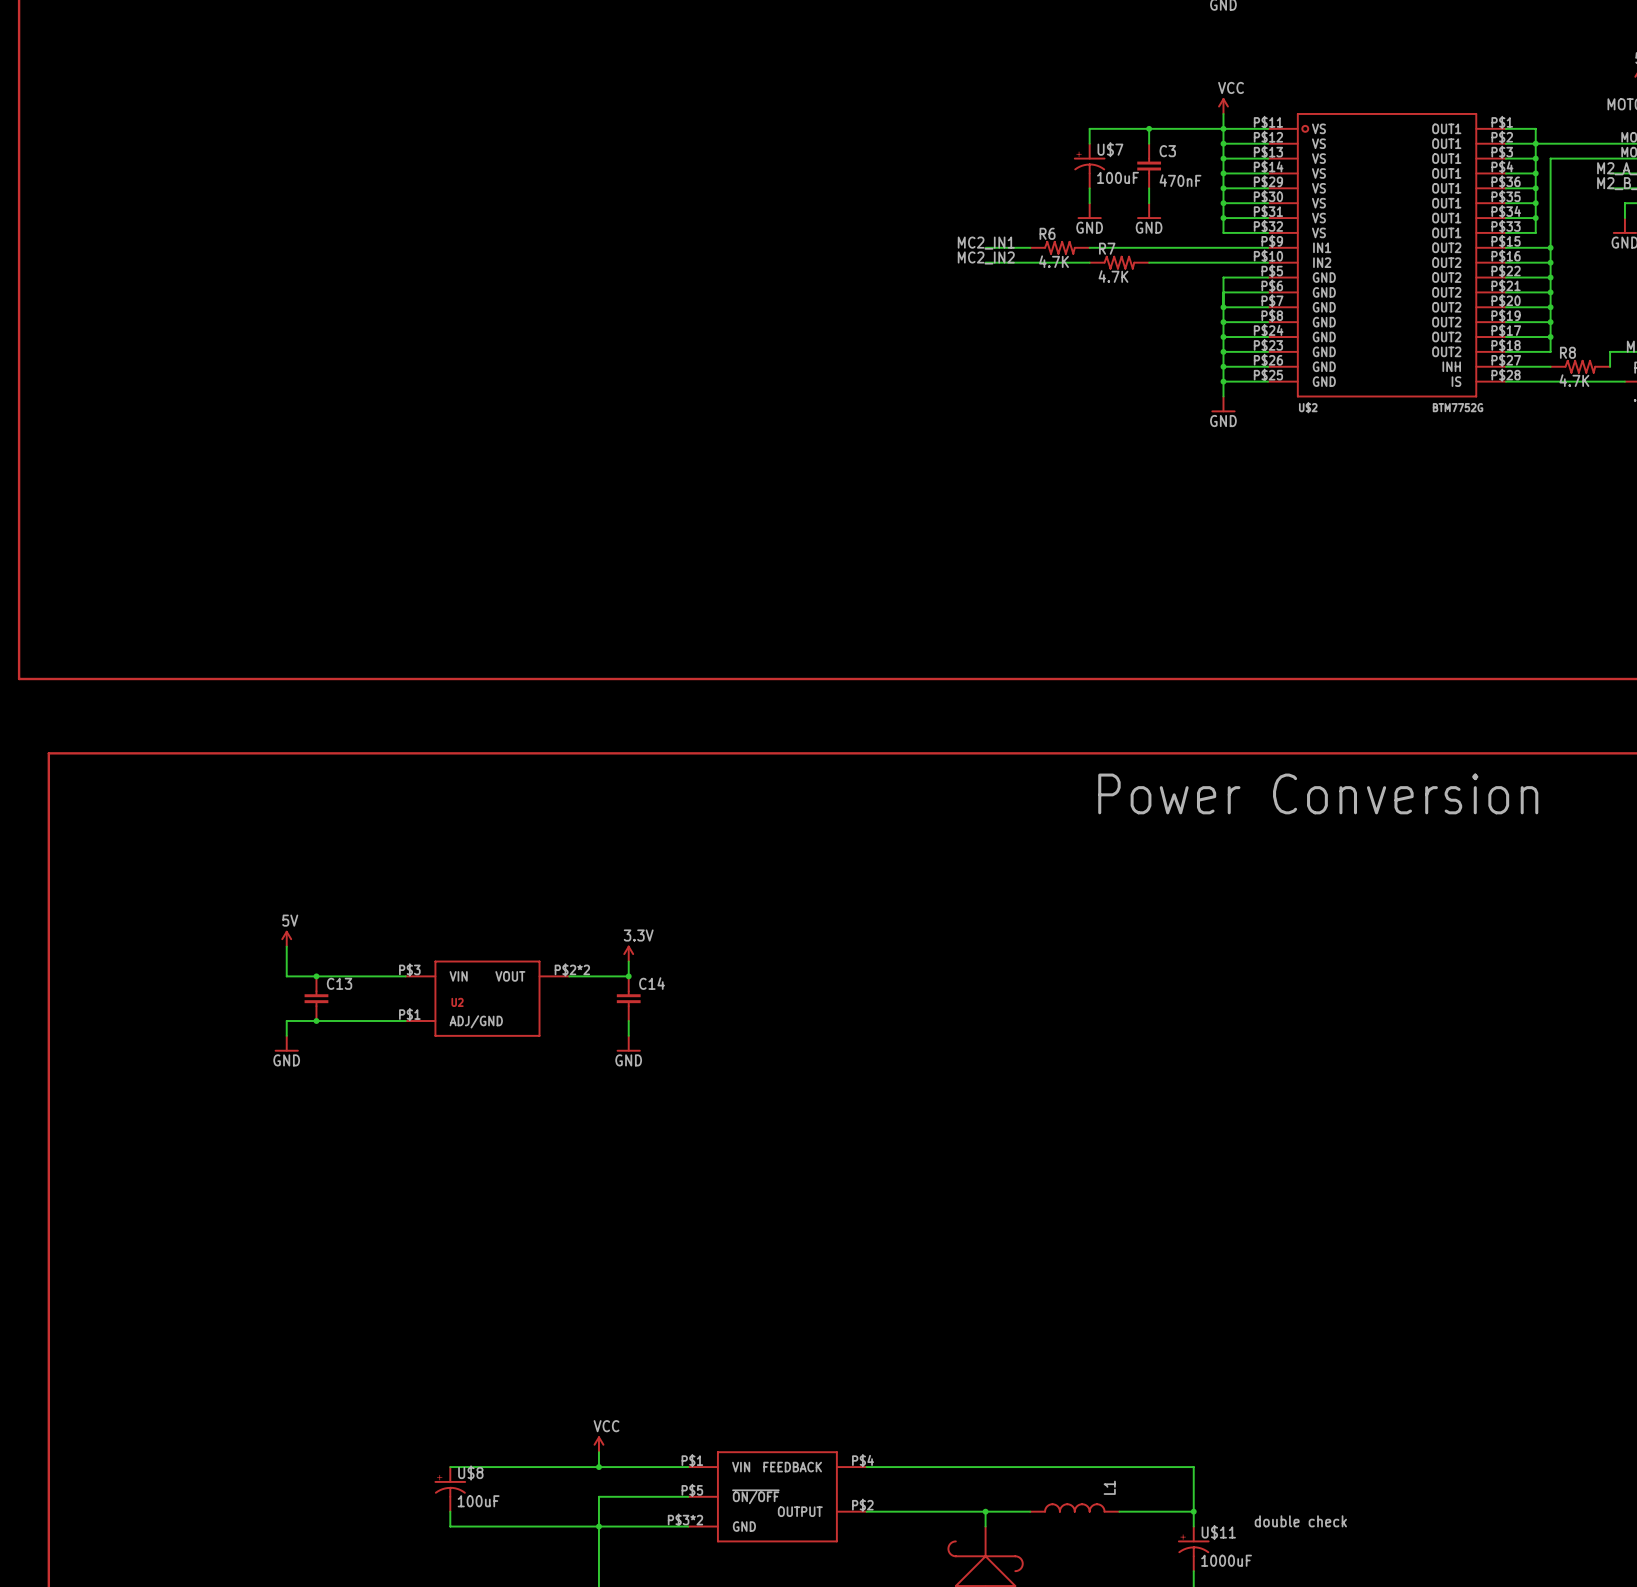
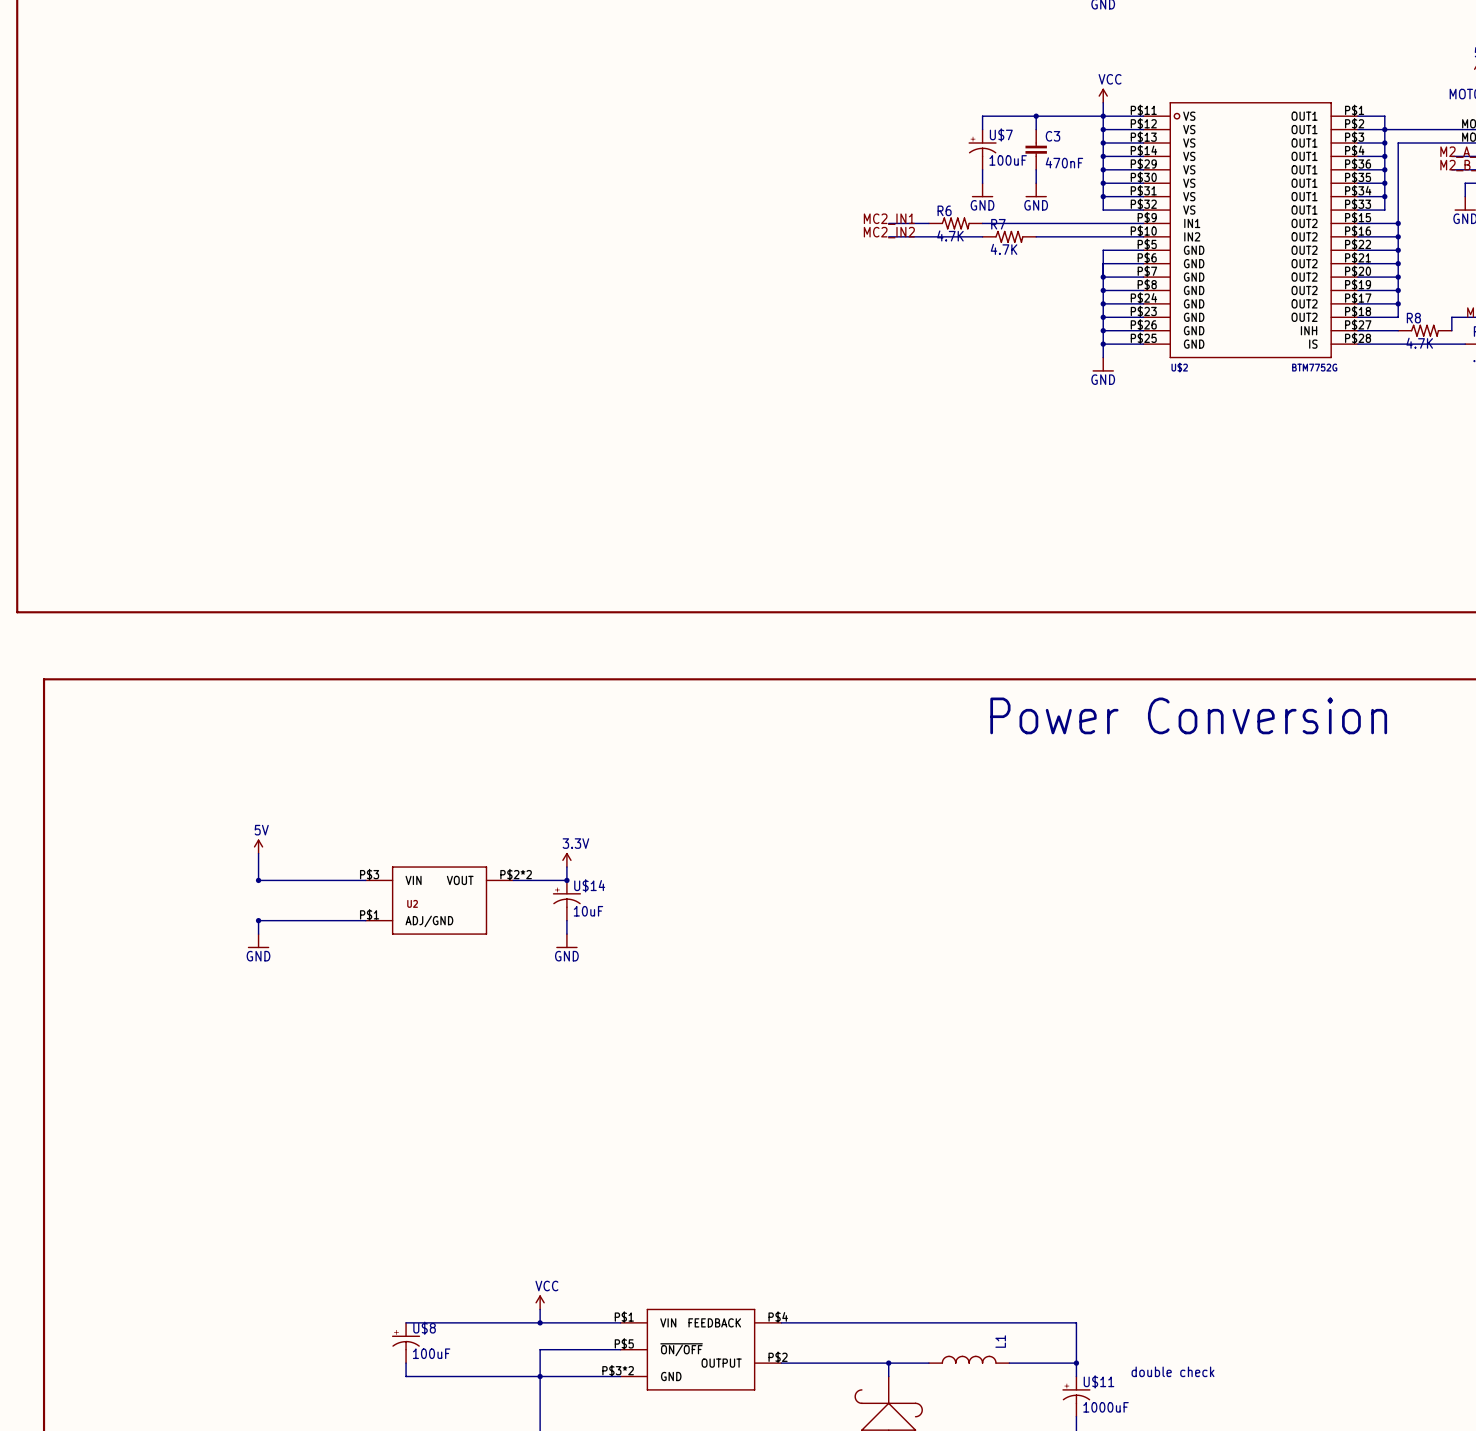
junction: none -> (258, 880)
junction: (316, 976) -> none
C13: (316, 998) -> none
C14: (628, 998) -> none
U$14: none -> 10uF (566, 900)
junction: none -> (258, 920)
junction: (316, 1020) -> none

